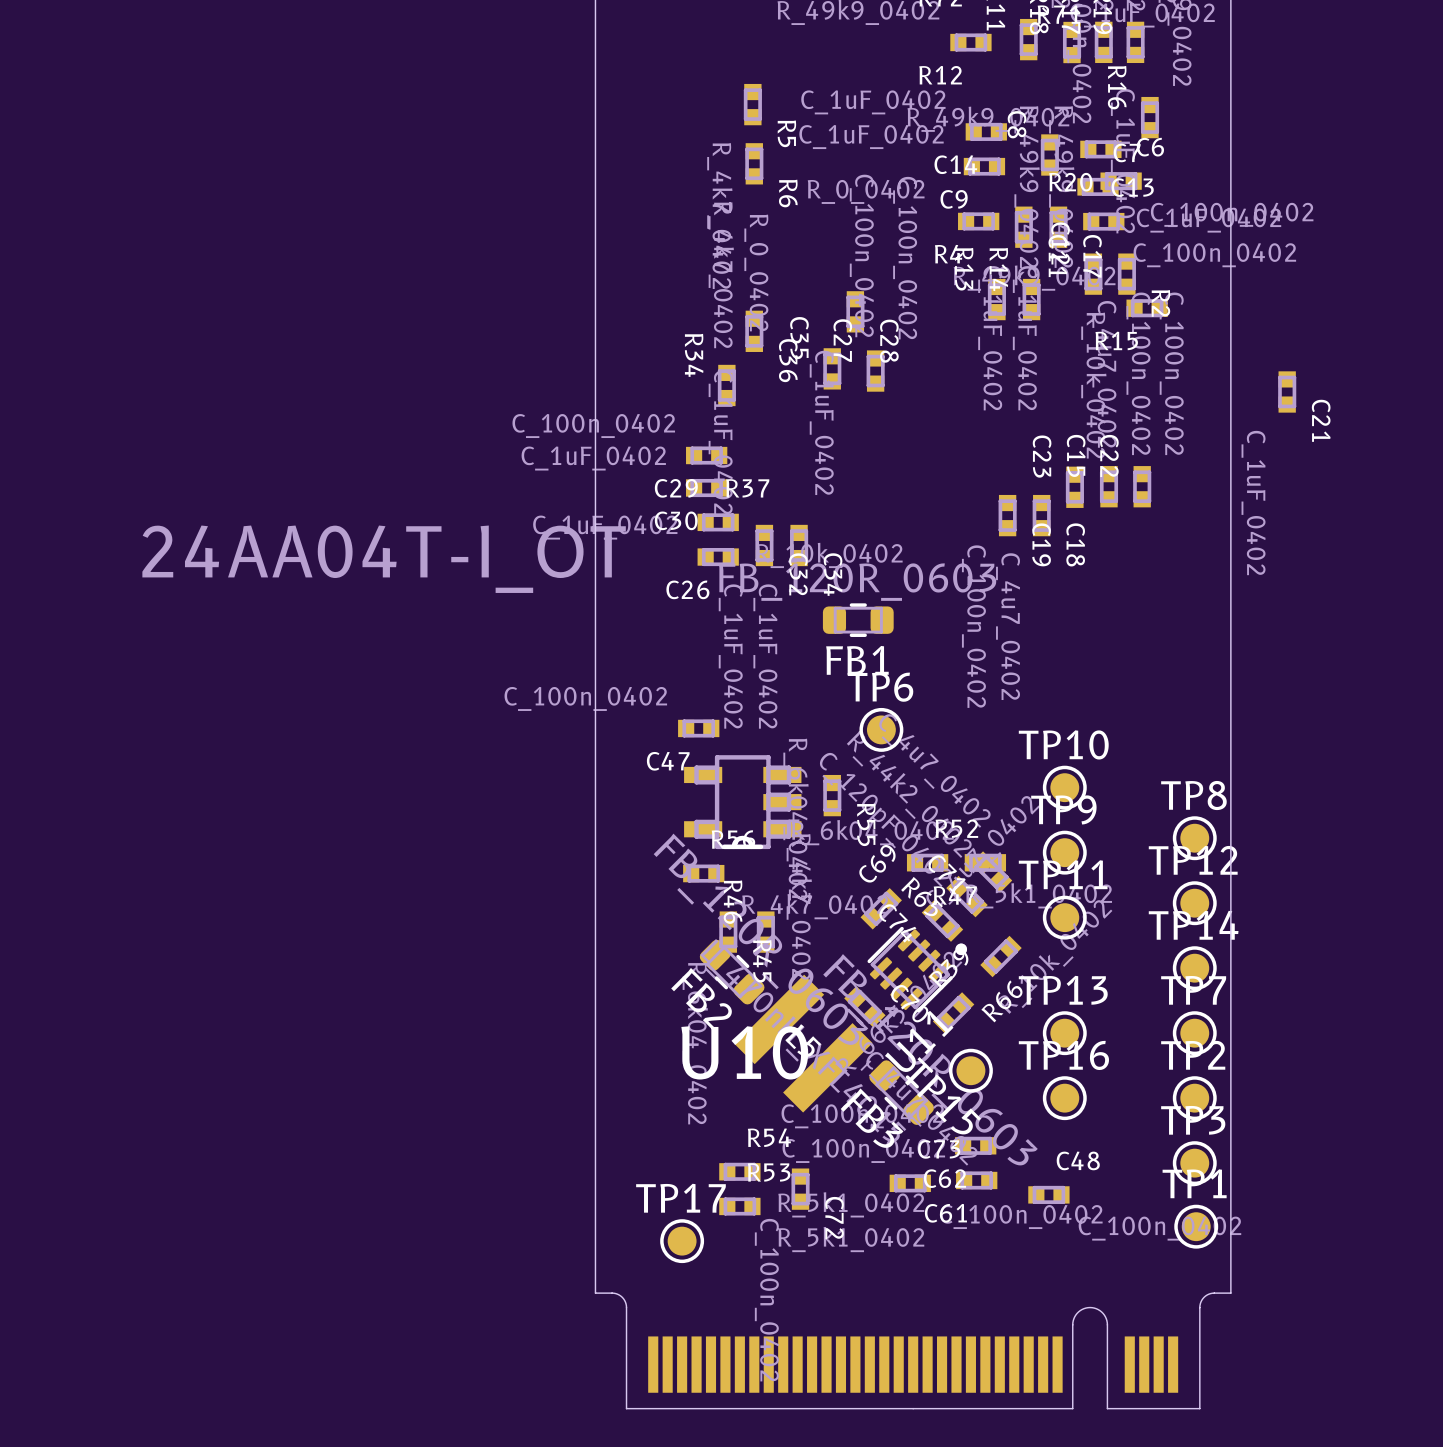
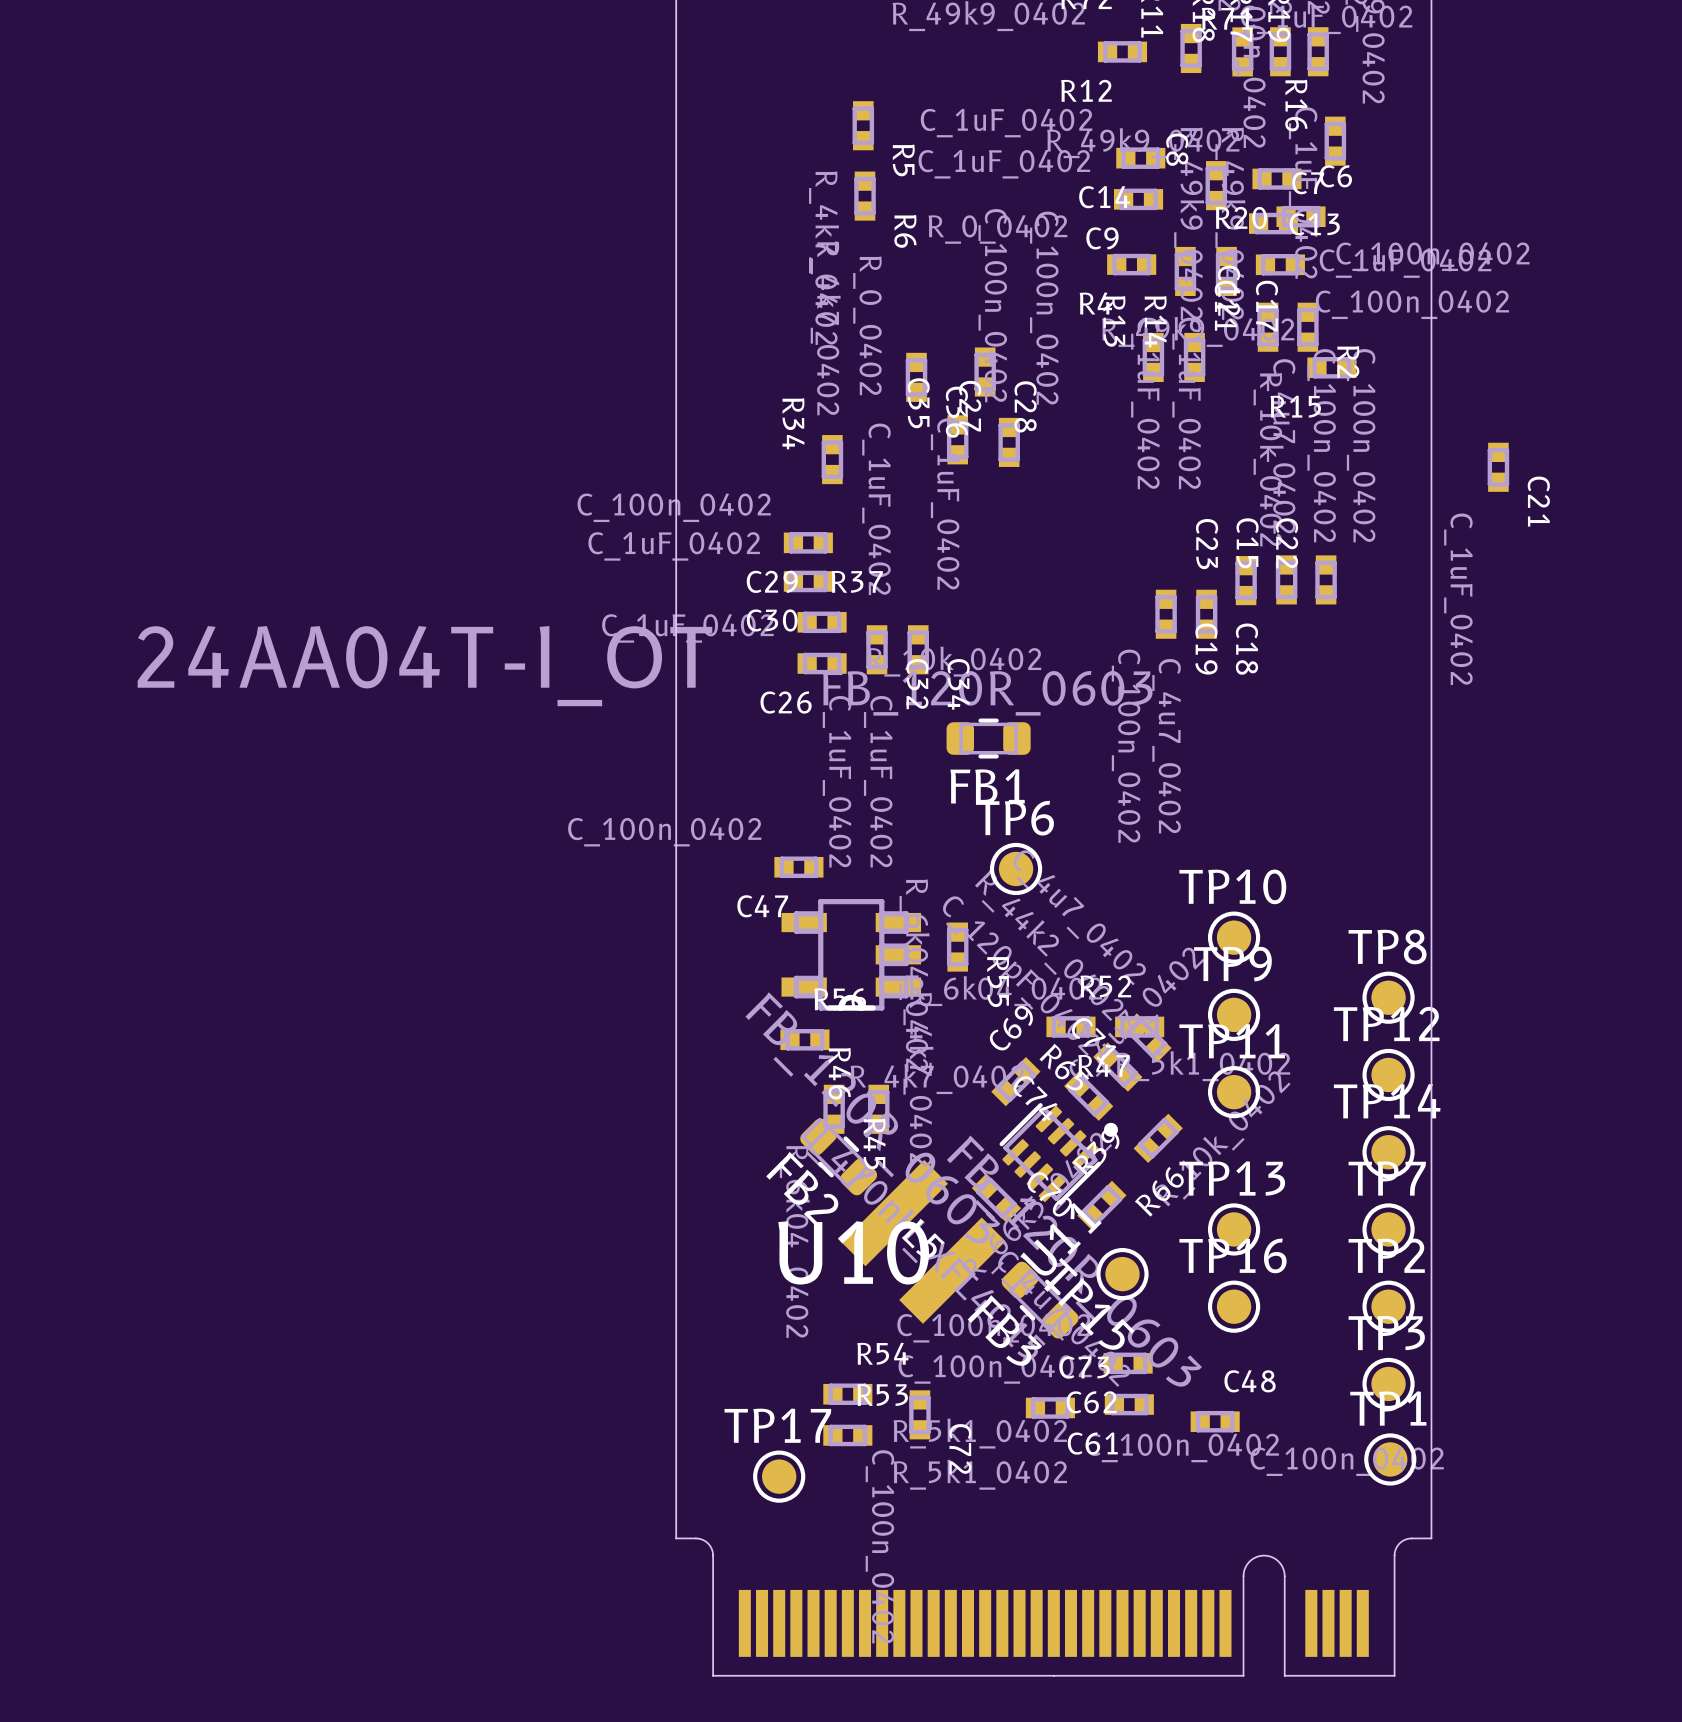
C36 position: (754, 331) -> (916, 377)

